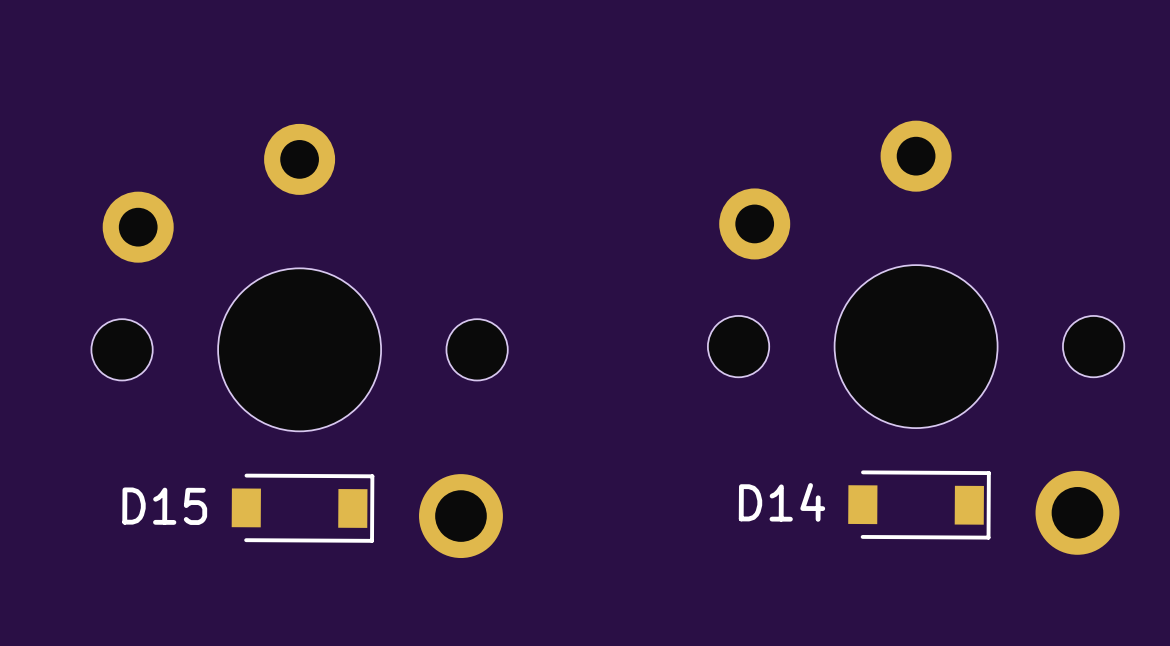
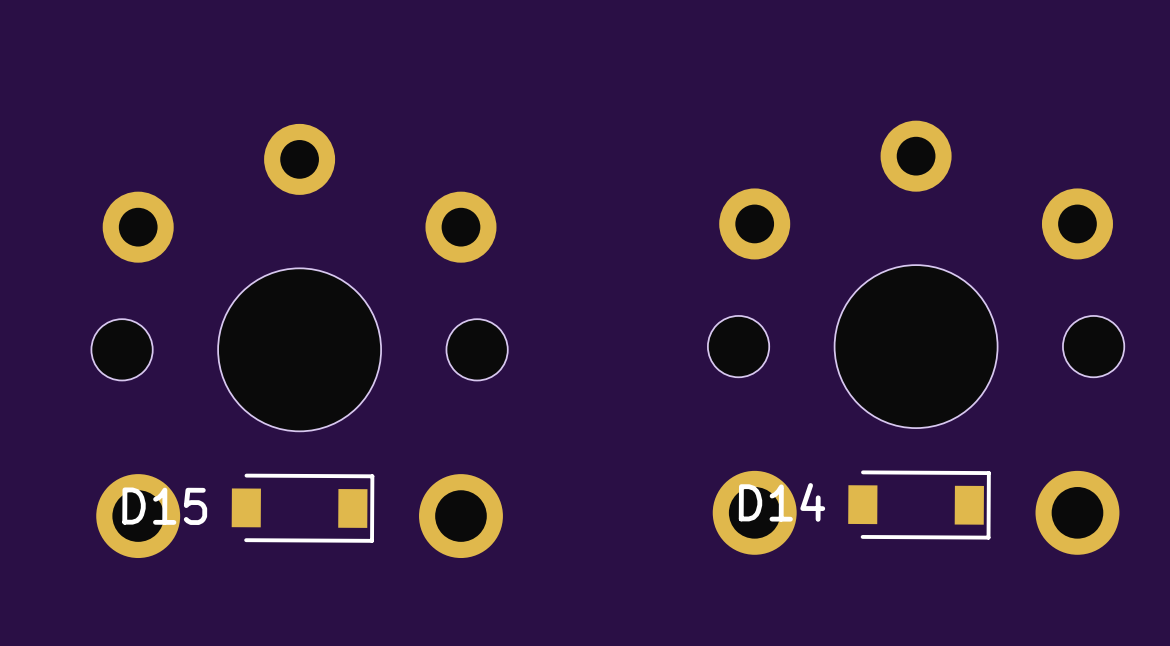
part footprint: [707, 120, 1125, 555] -> [707, 120, 1125, 555]
part footprint: [91, 123, 508, 559] -> [91, 123, 508, 559]

